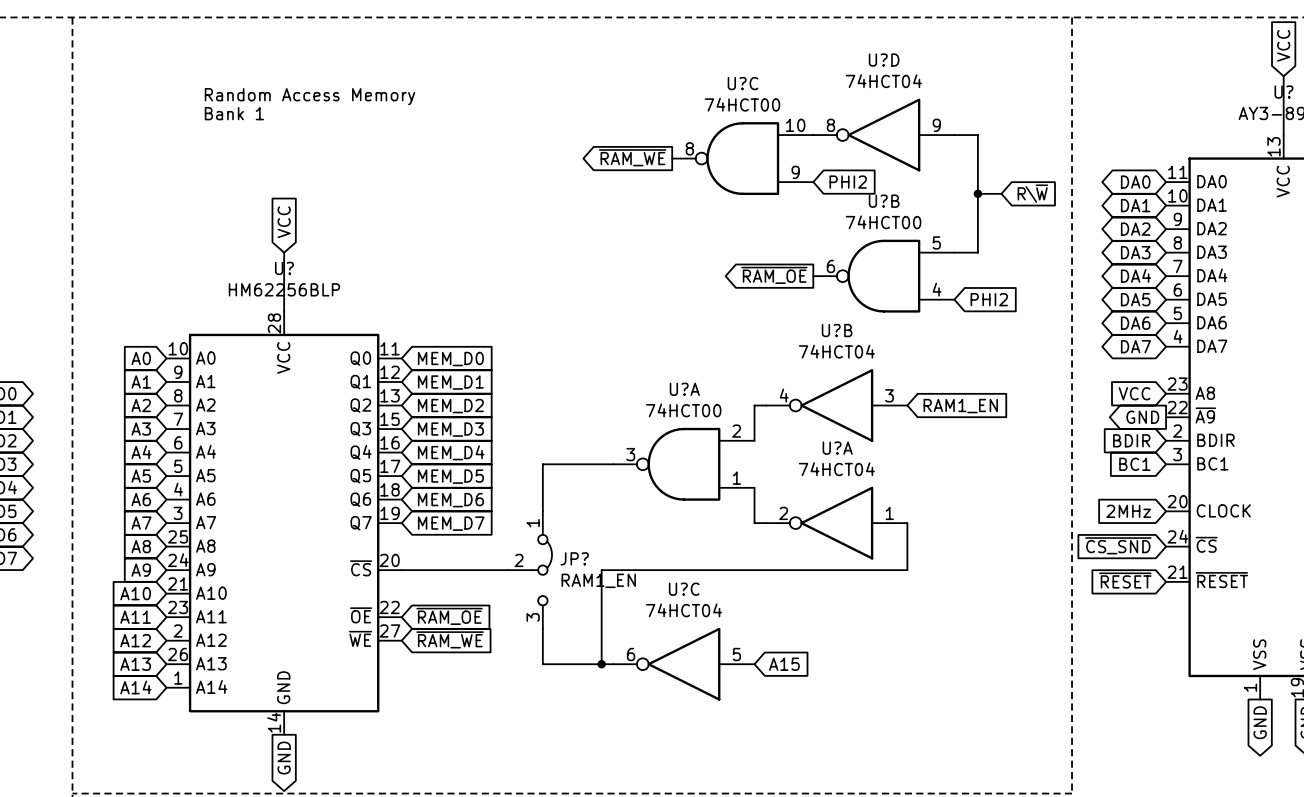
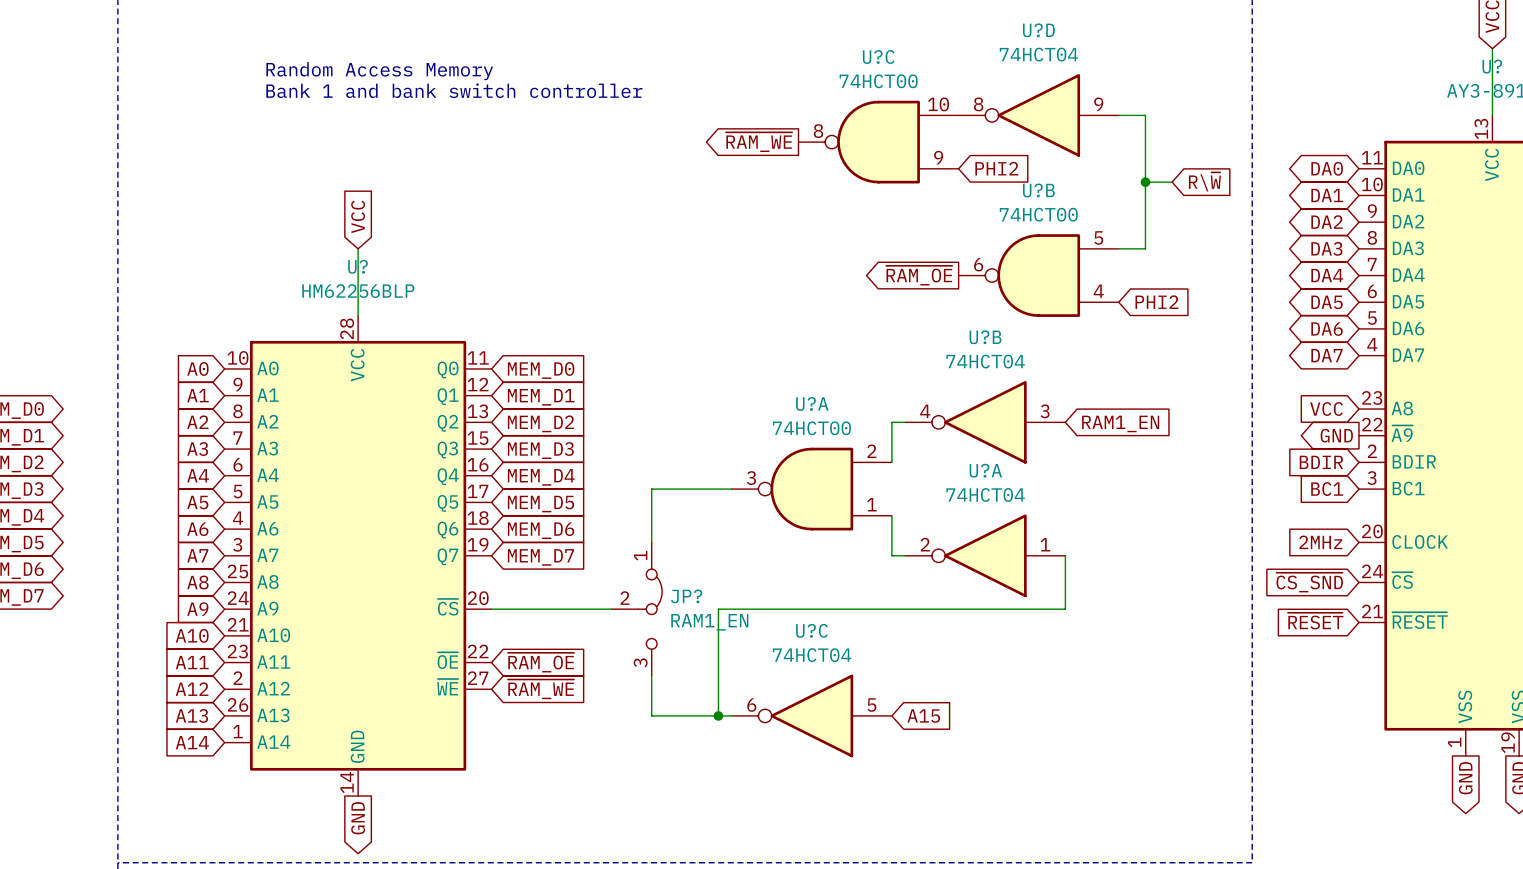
text: Bank 1 (234, 113) -> Bank 1 and bank switch controller (454, 90)

